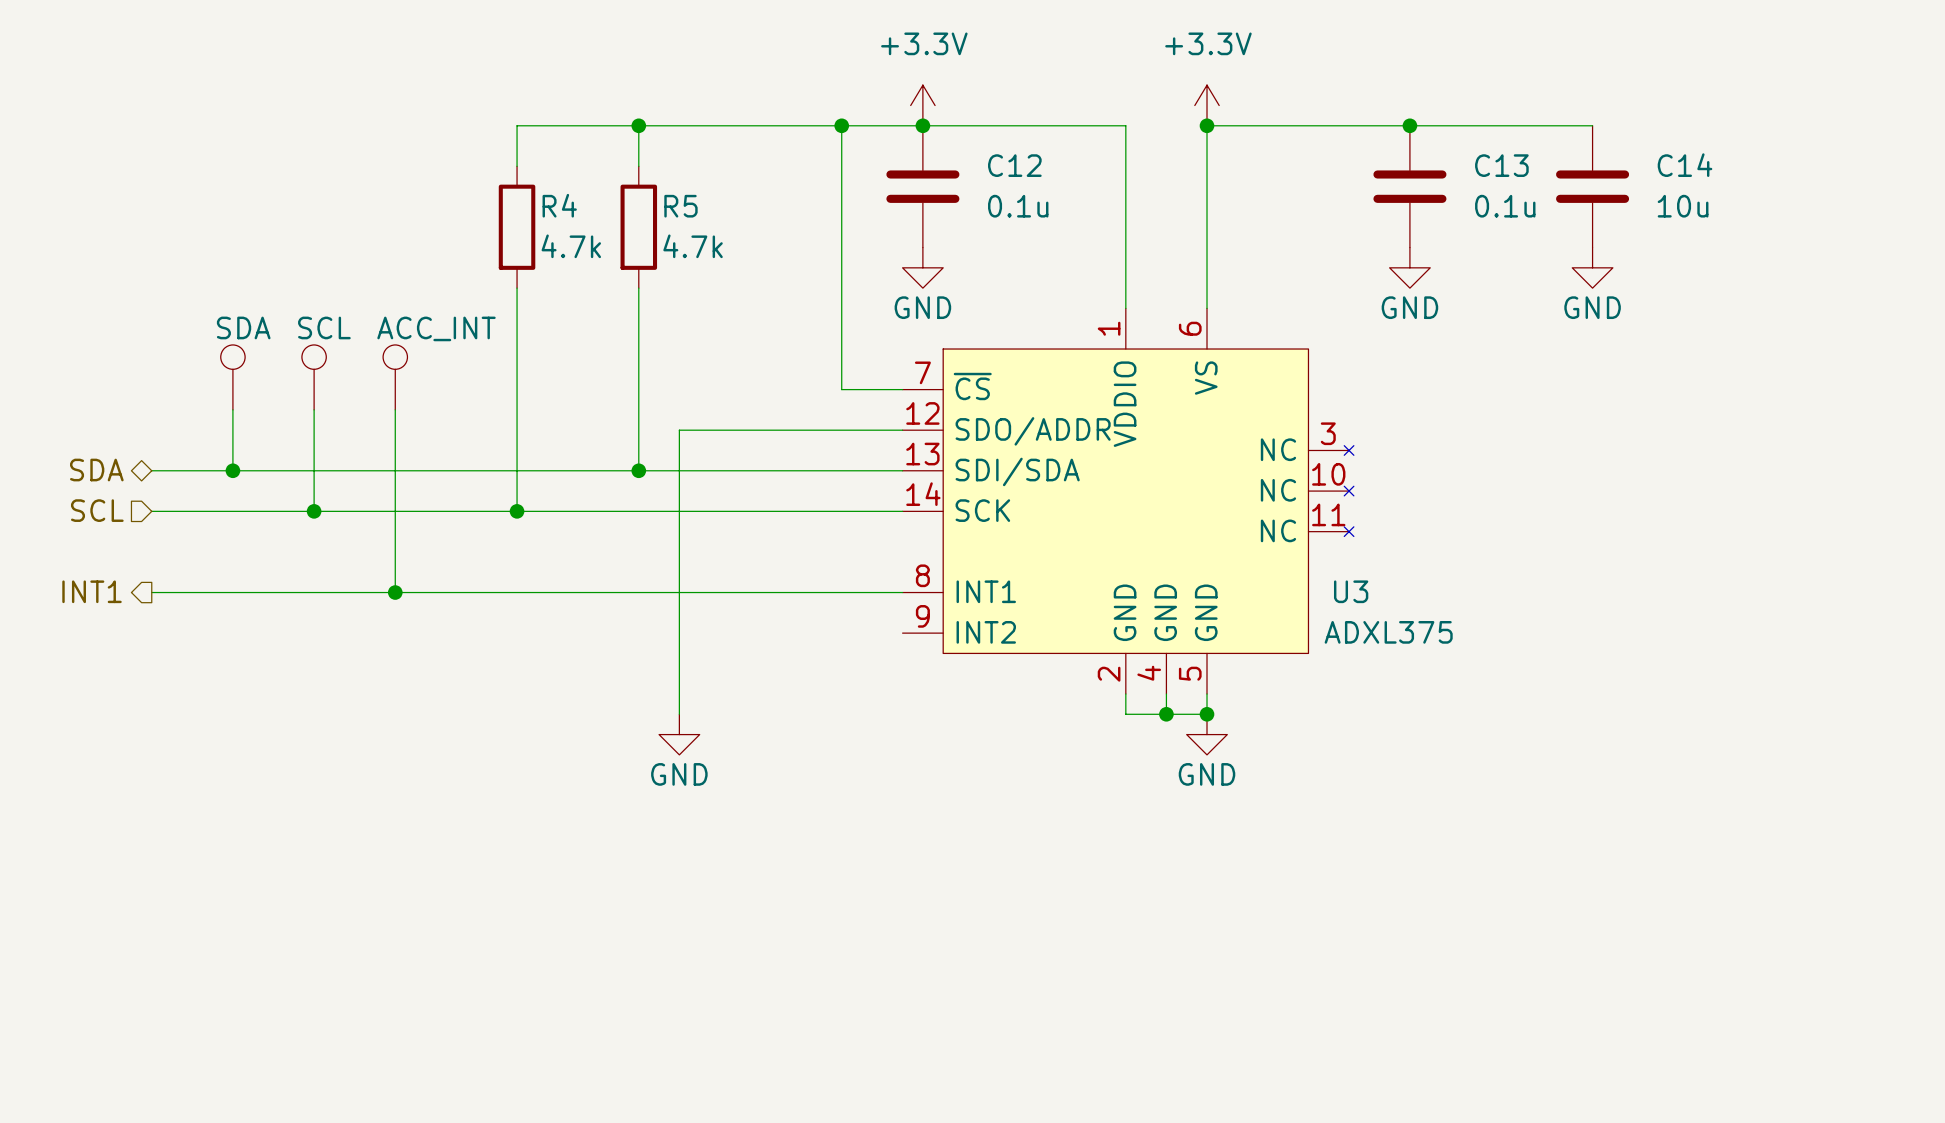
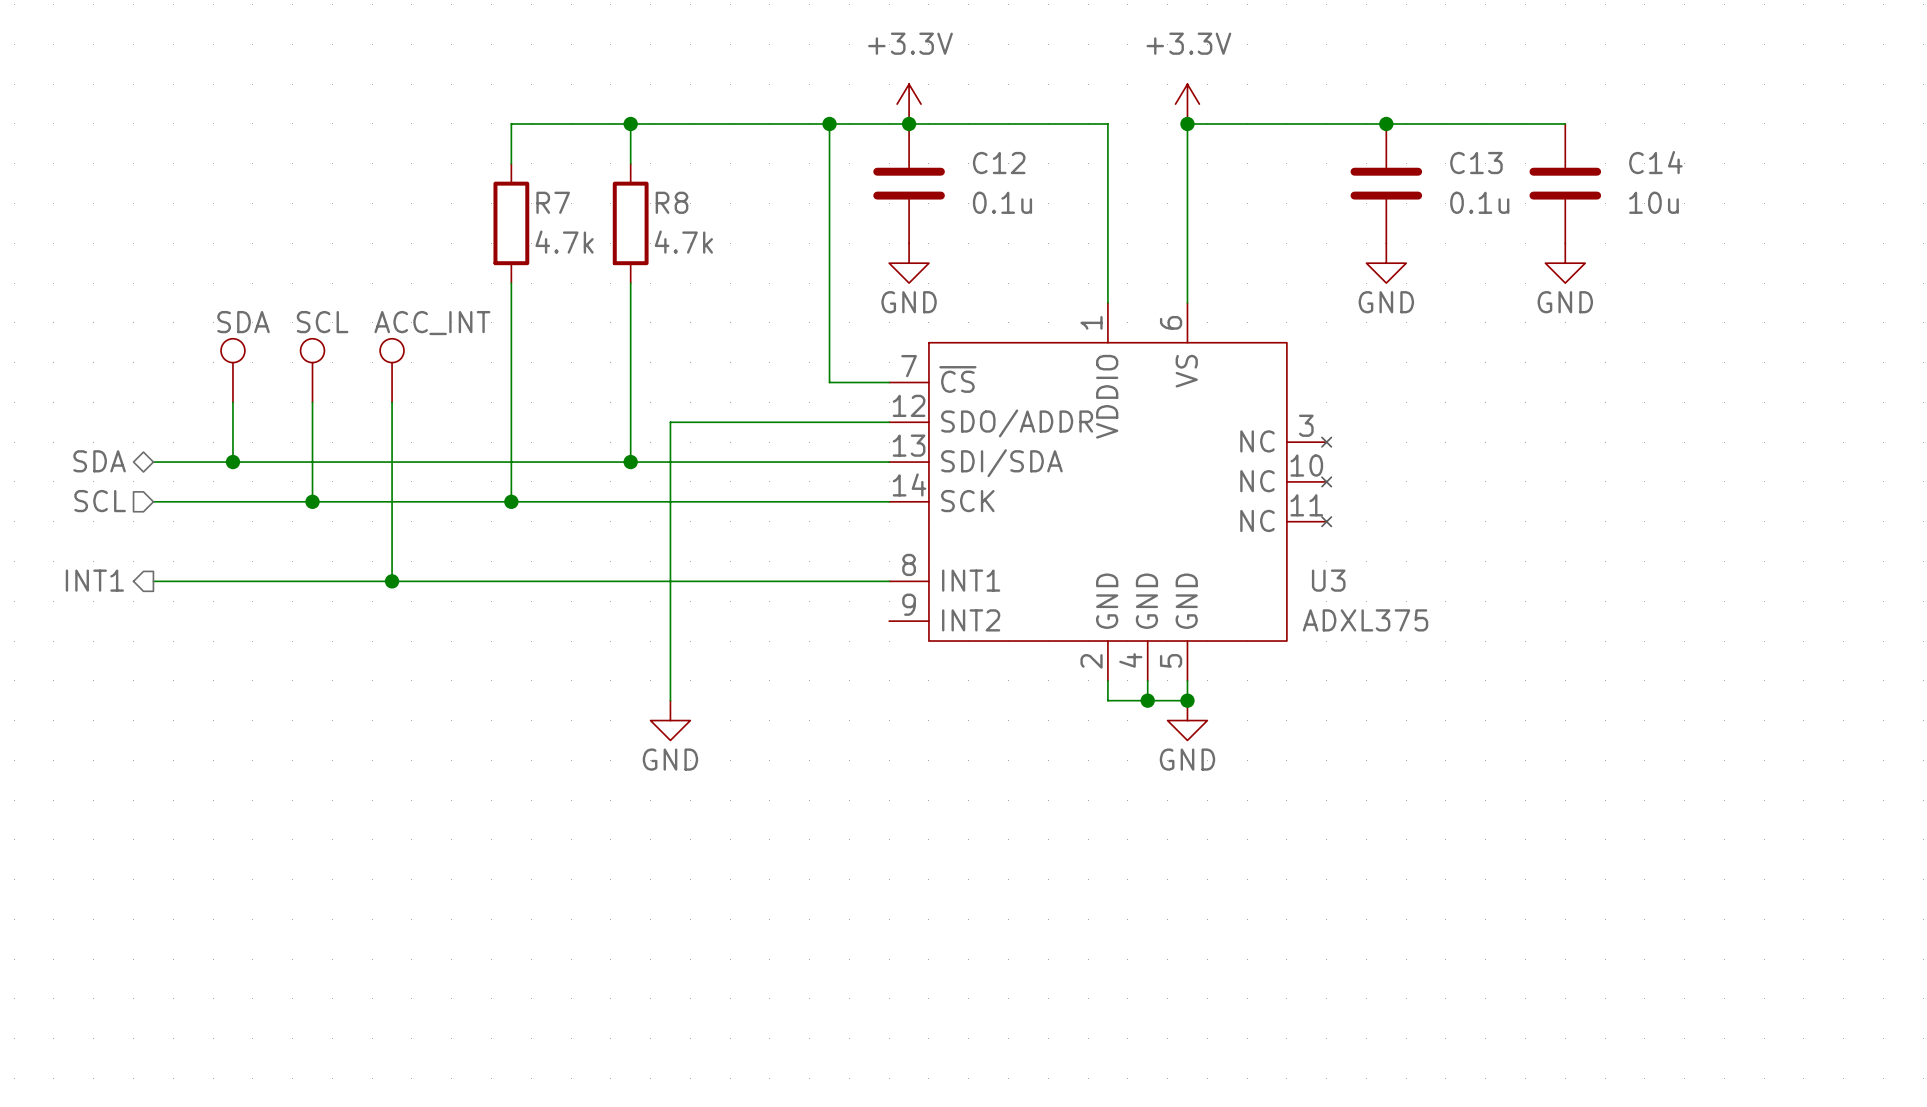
R4 name: R4 (559, 205) -> R7 (553, 202)
R5 name: R5 (680, 206) -> R8 (672, 202)

